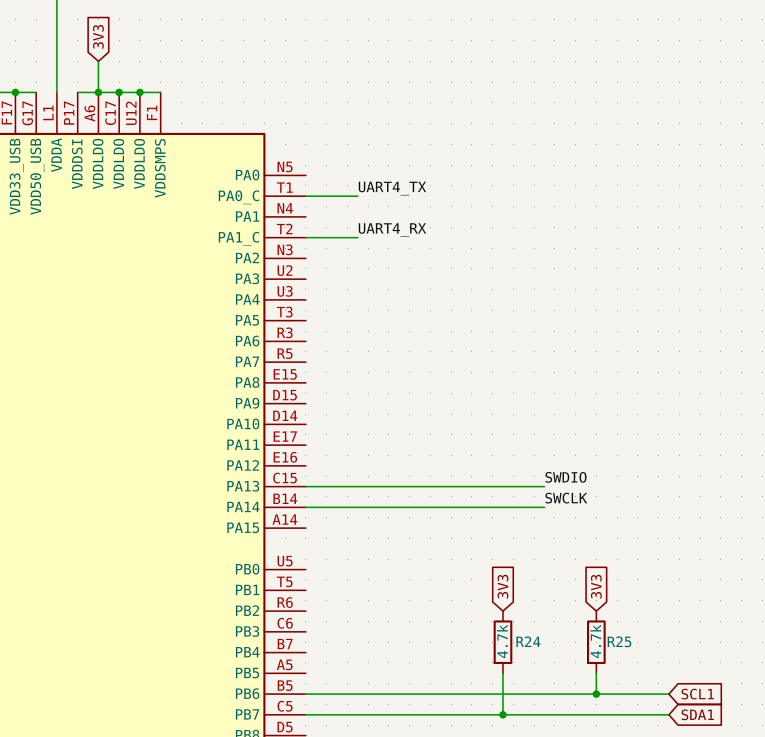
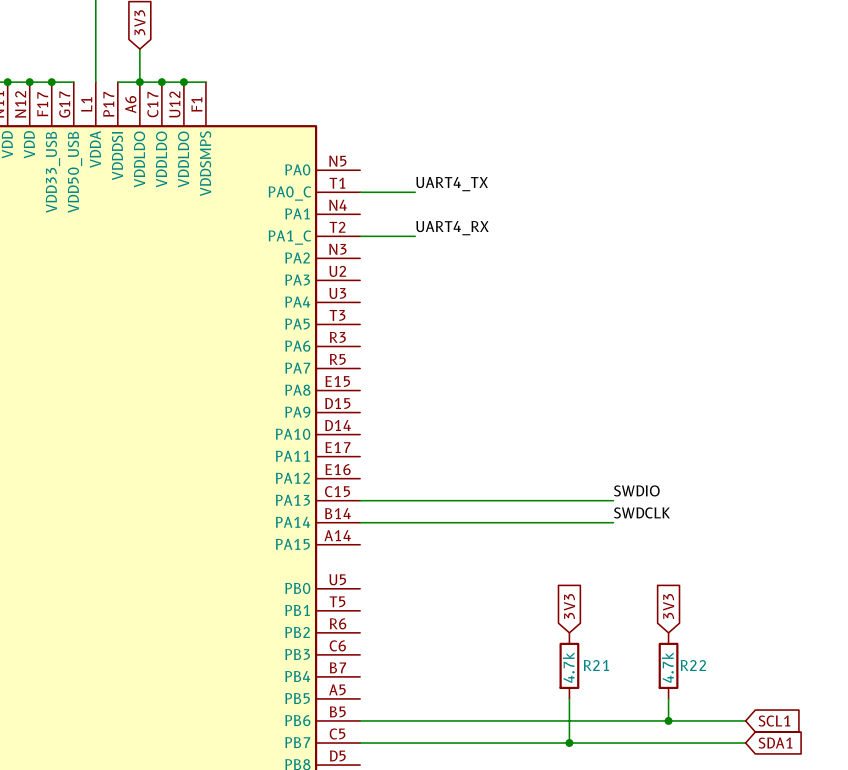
label: SWCLK (566, 498) -> SWDCLK (642, 512)
R24 name: R24 (528, 641) -> R21 (596, 665)
R25 name: R25 (619, 641) -> R22 (693, 665)

